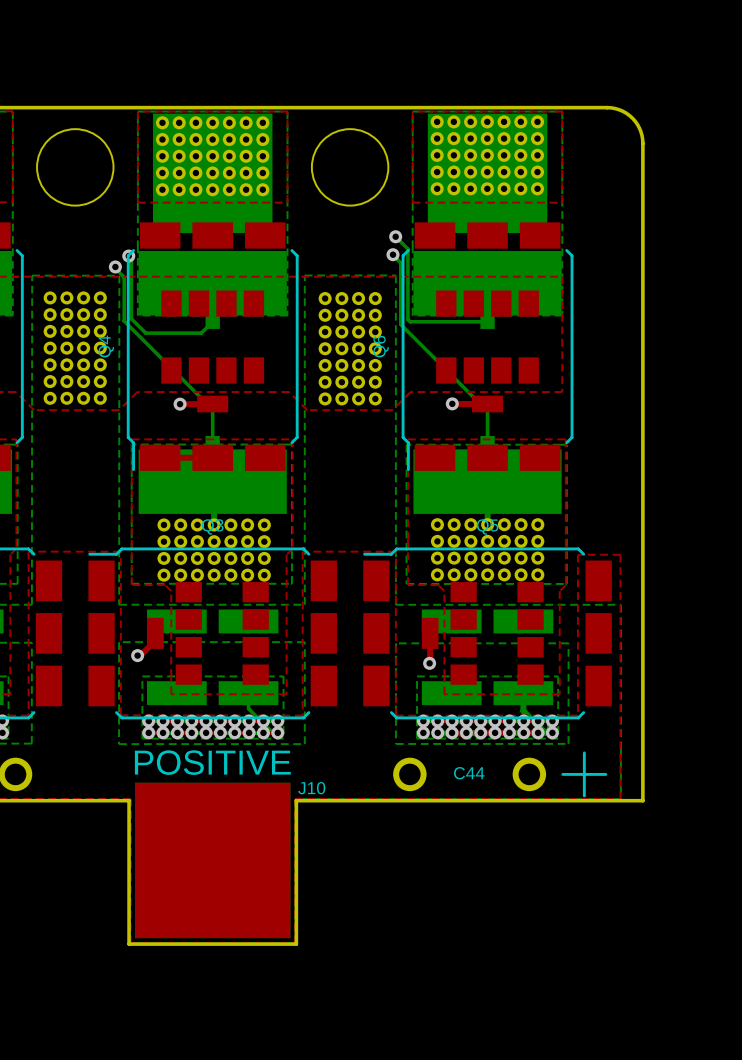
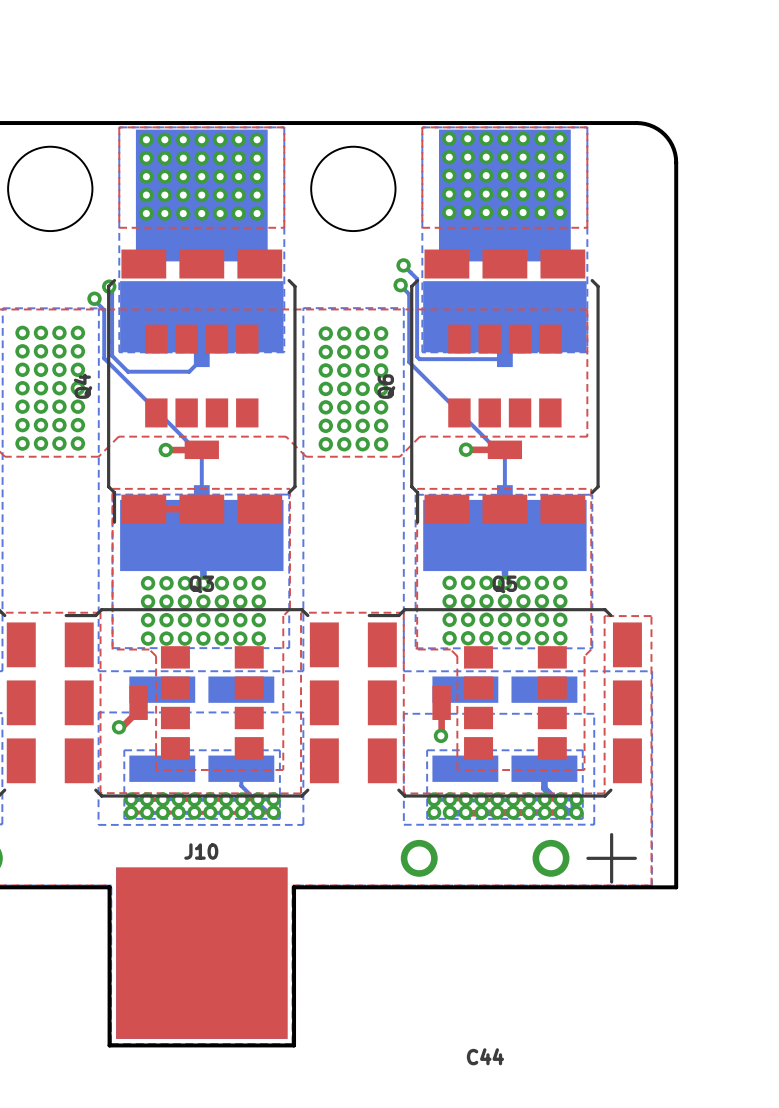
text: POSITIVE (212, 762) -> none
C44 name position: C44 (469, 773) -> C44 (485, 1056)
J10 name position: J10 (311, 788) -> J10 (201, 851)

